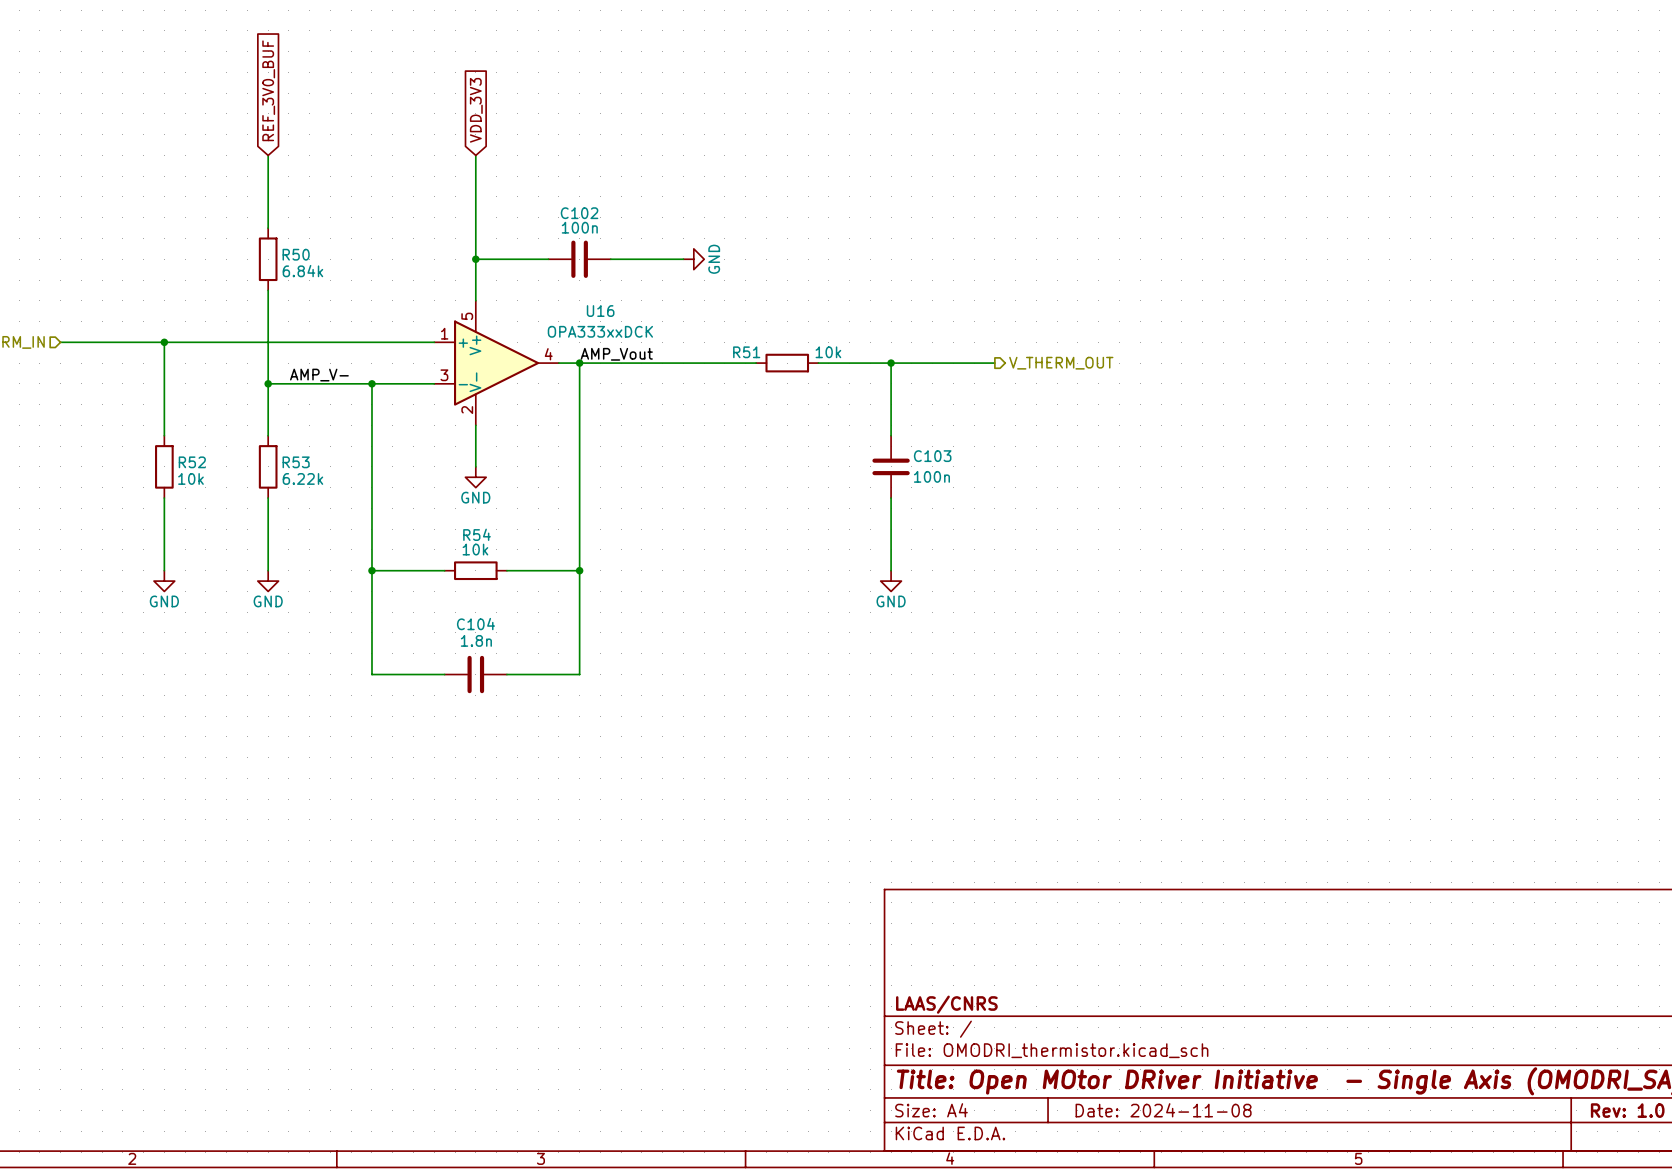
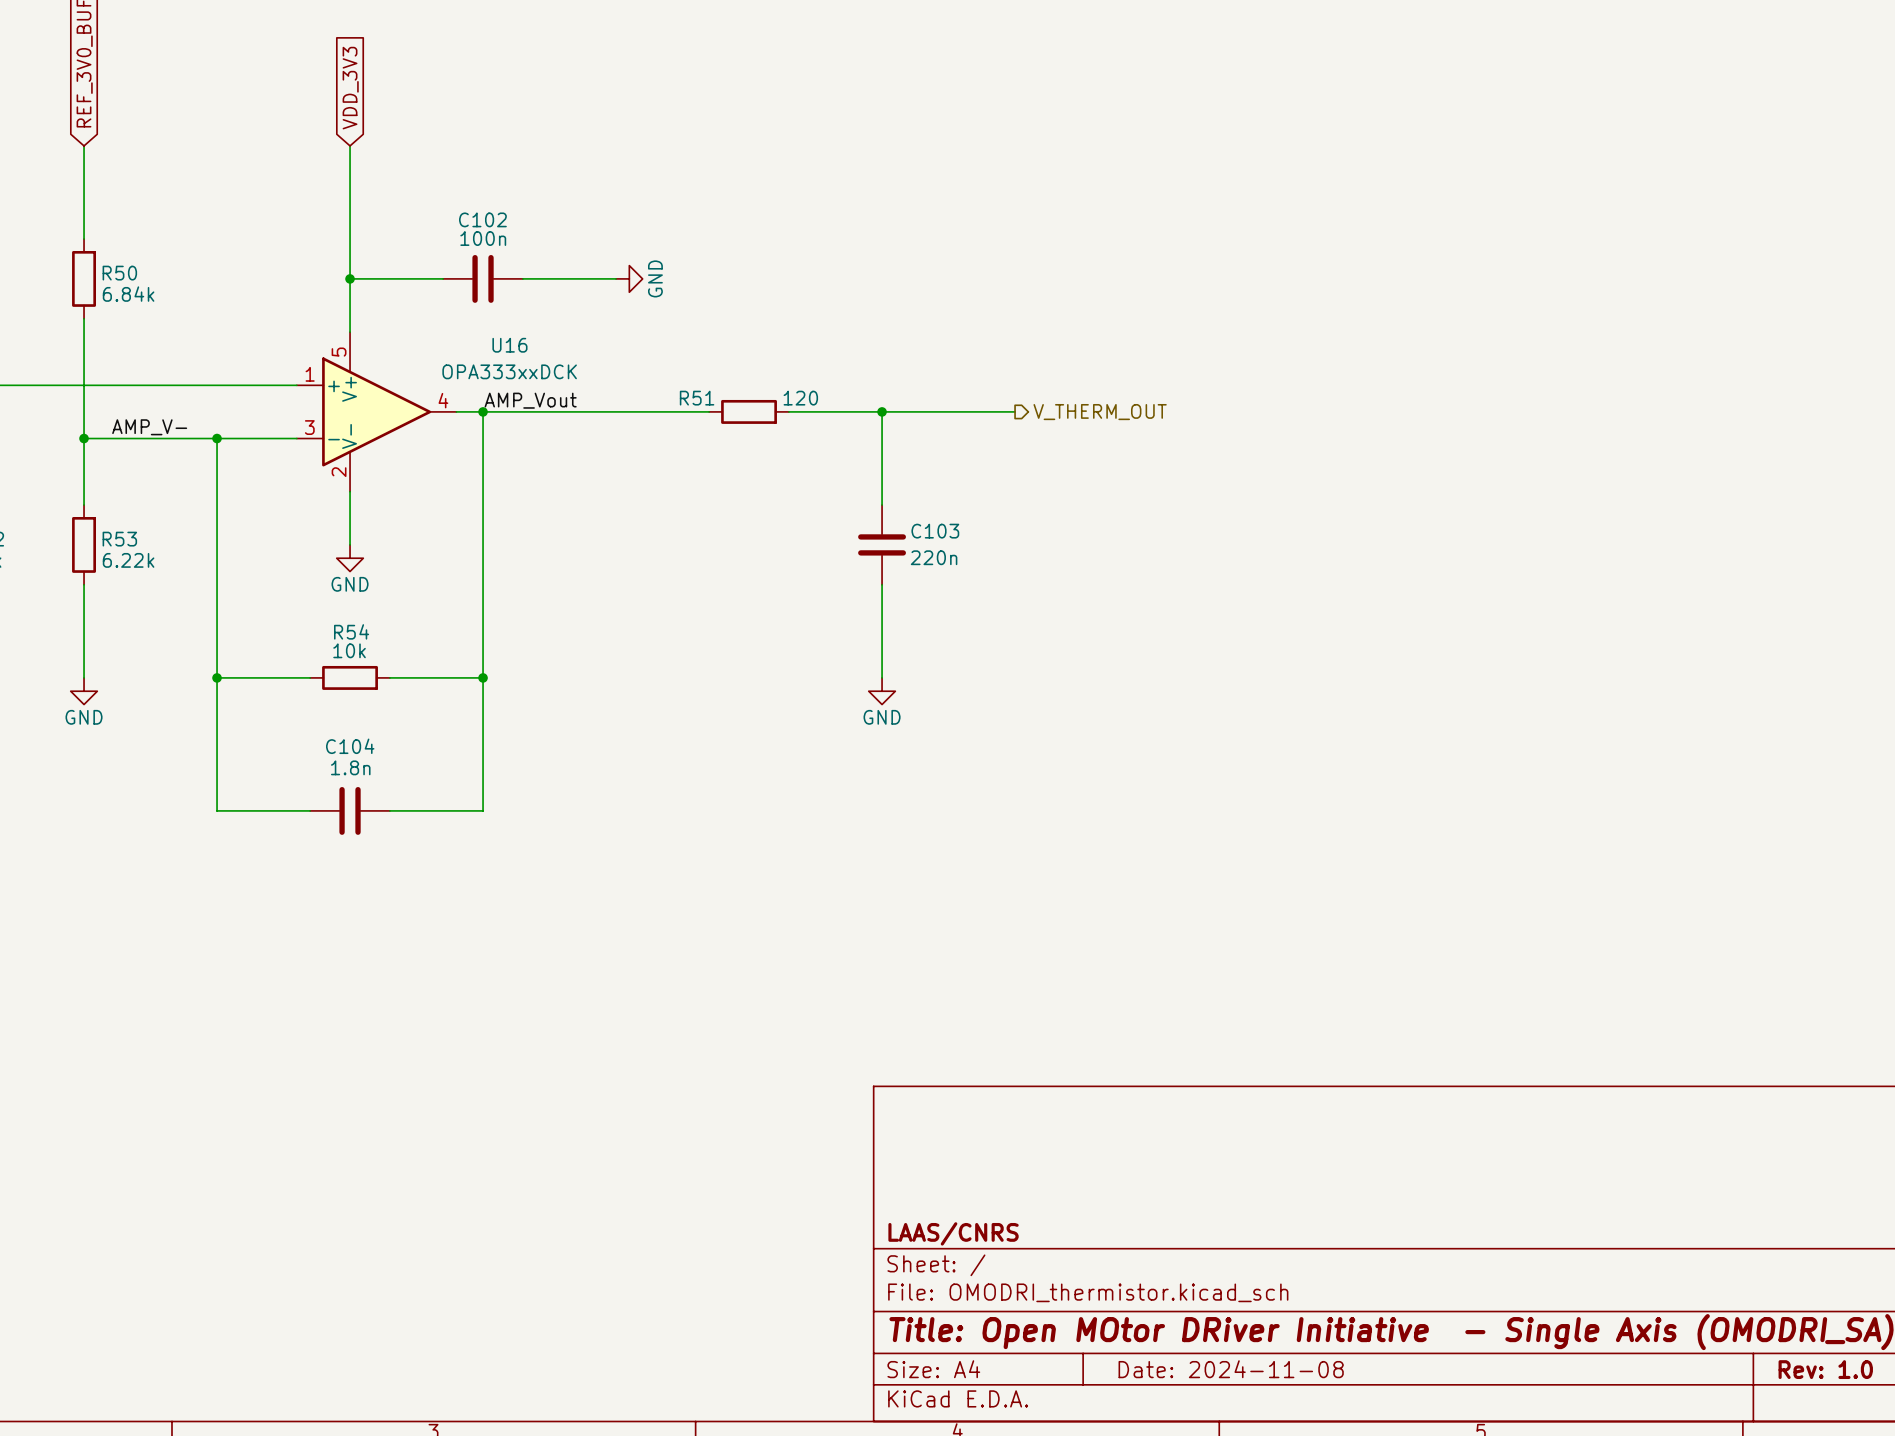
R51 value: 10k (828, 352) -> 120 (800, 398)
C103 value: 100n (931, 476) -> 220n (934, 557)

